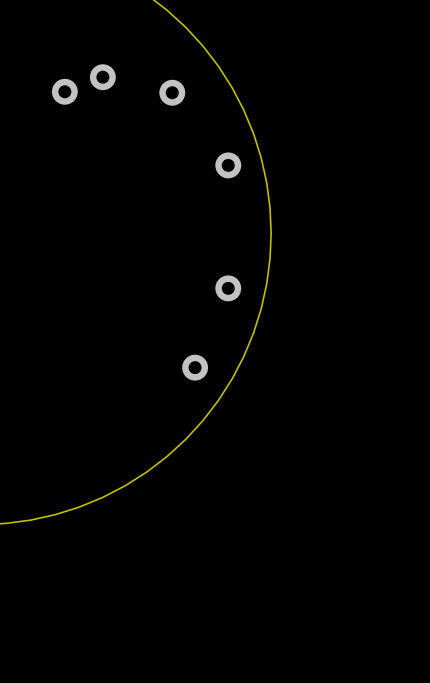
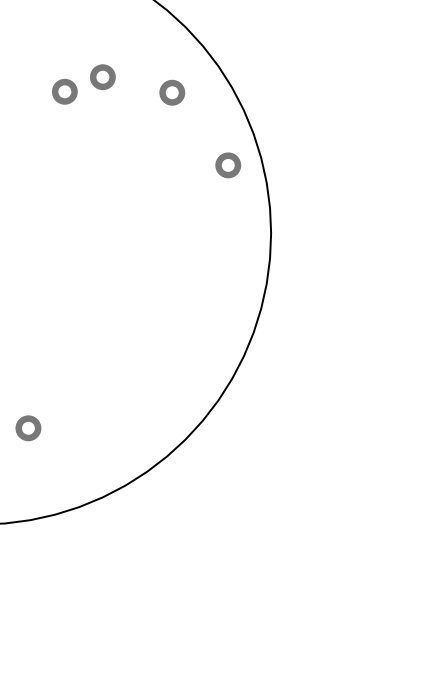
via: (228, 288) -> none
via: (195, 367) -> none
via: none -> (28, 428)

